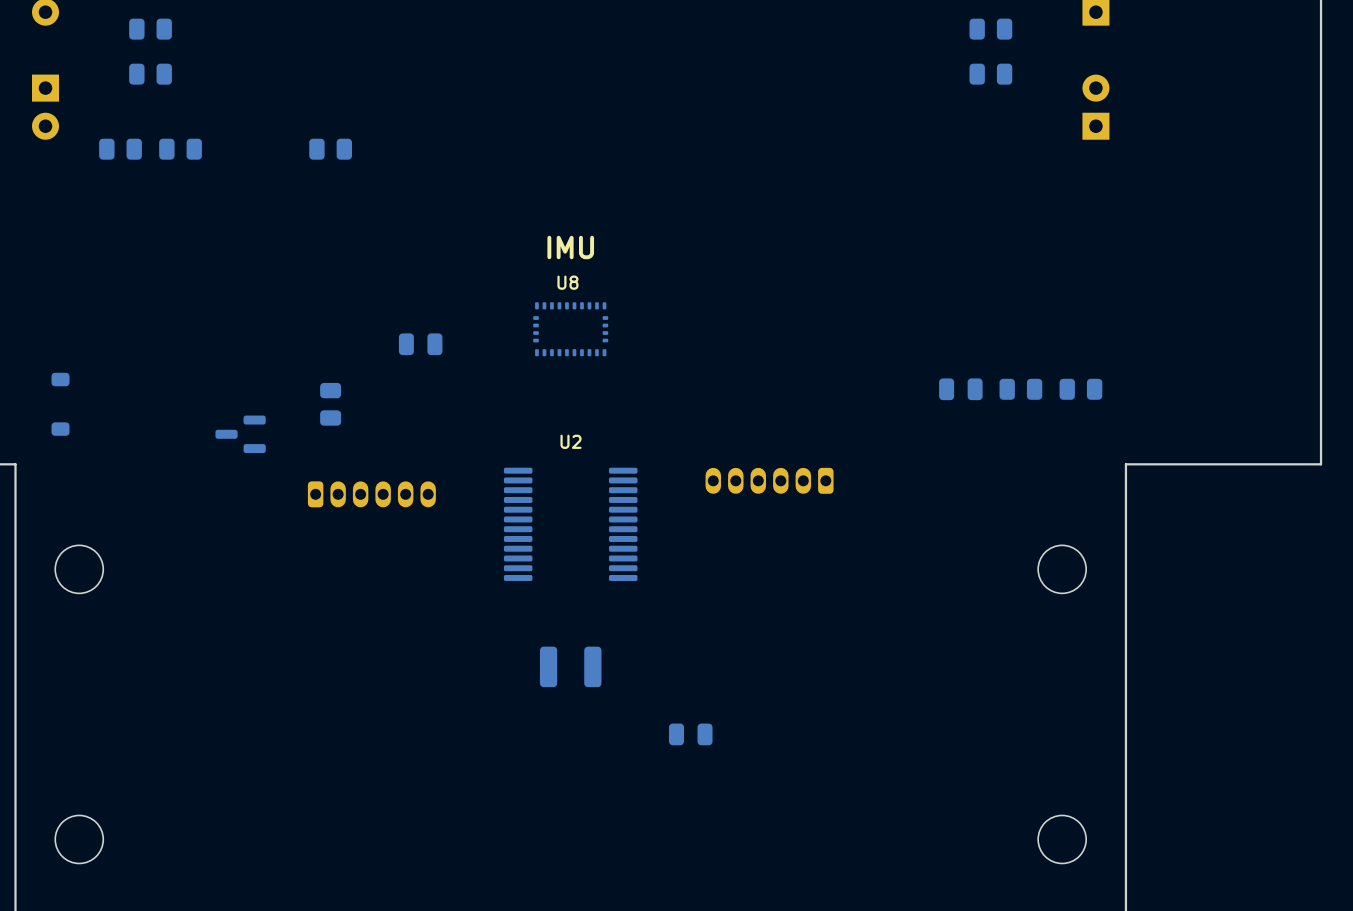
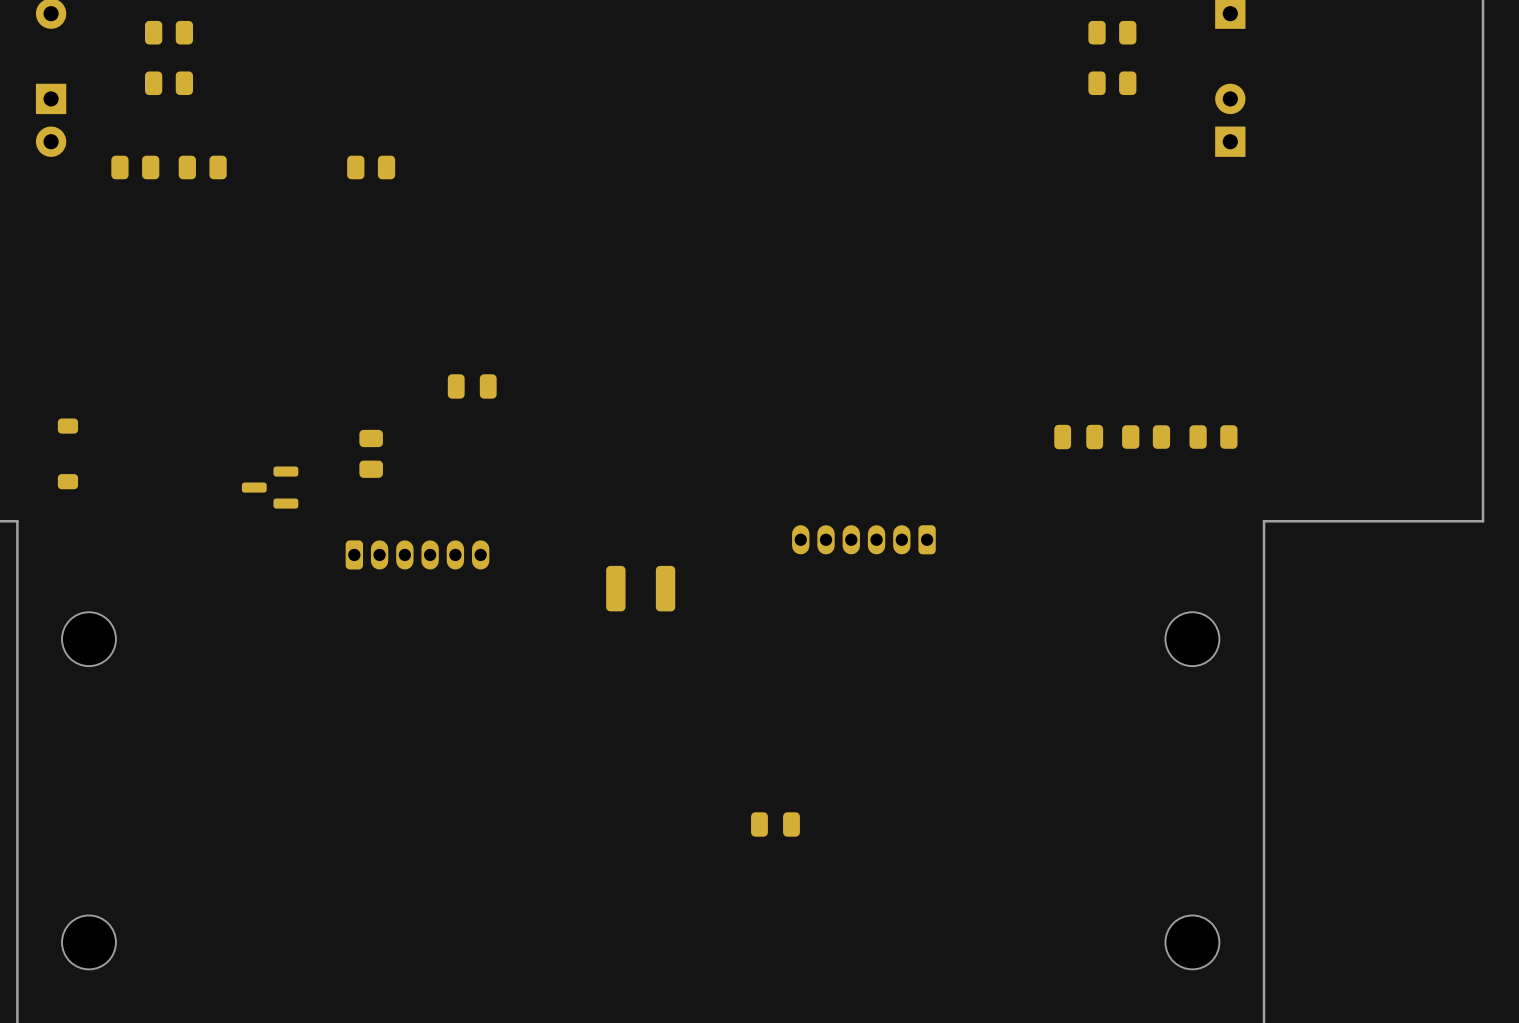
text: IMU (570, 247) -> none
U8: (570, 329) -> none
U2: (570, 524) -> none
part position: (570, 666) -> (640, 588)

